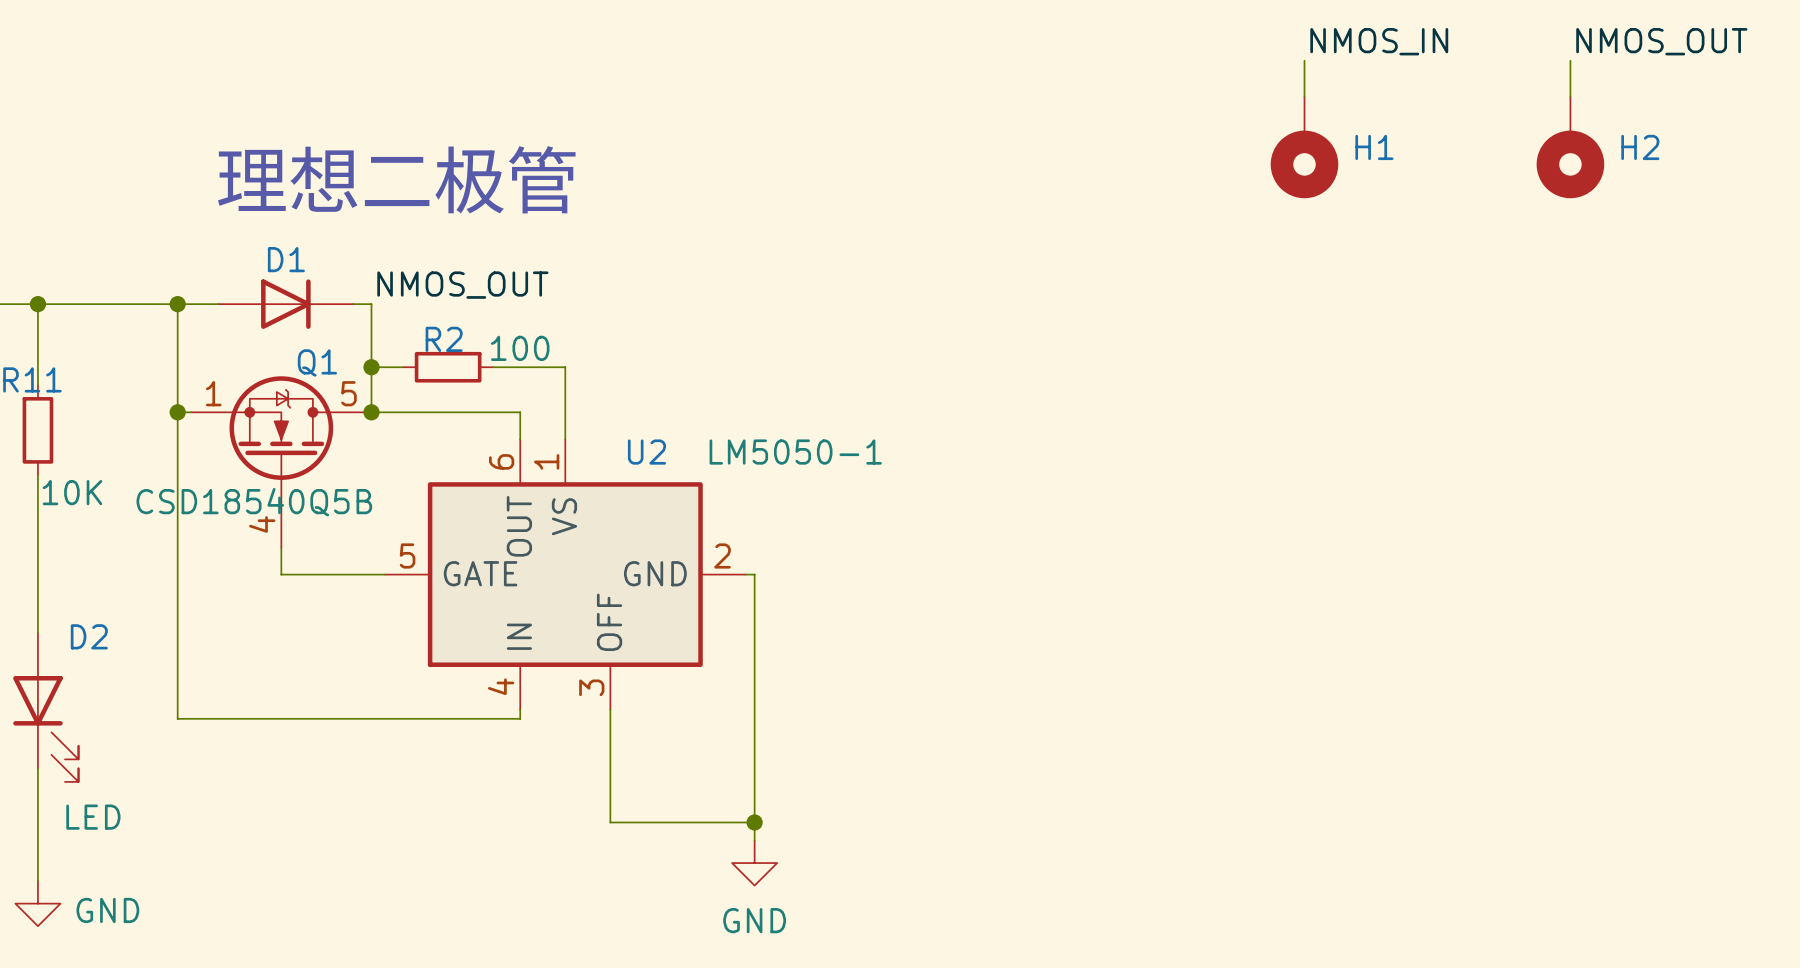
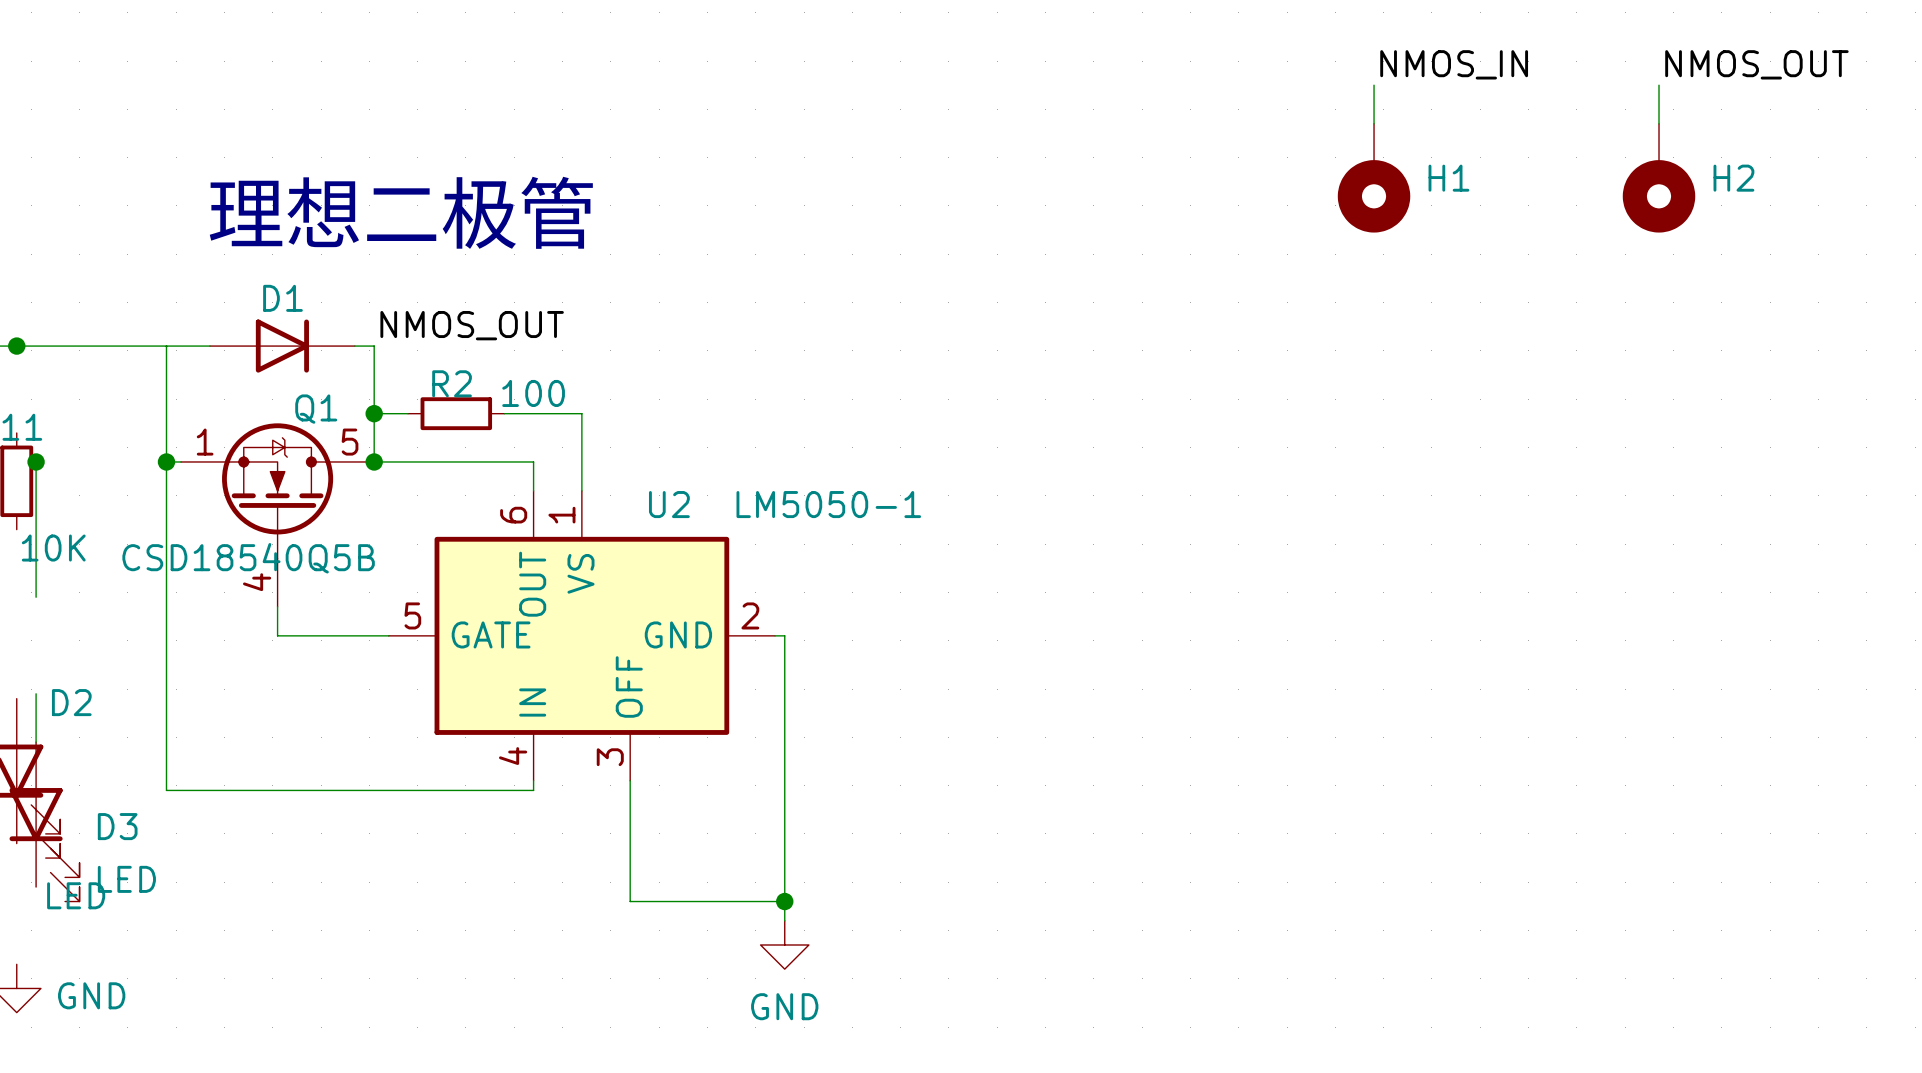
wire: (37, 304) (37, 385) -> none
junction: (177, 304) -> none
wire: none -> (36, 461) (36, 597)
junction: none -> (36, 461)
wire: (37, 475) (37, 633) -> none
wire: none -> (36, 693) (36, 742)
D3: none -> LED (44, 821)
wire: (37, 768) (37, 881) -> none

